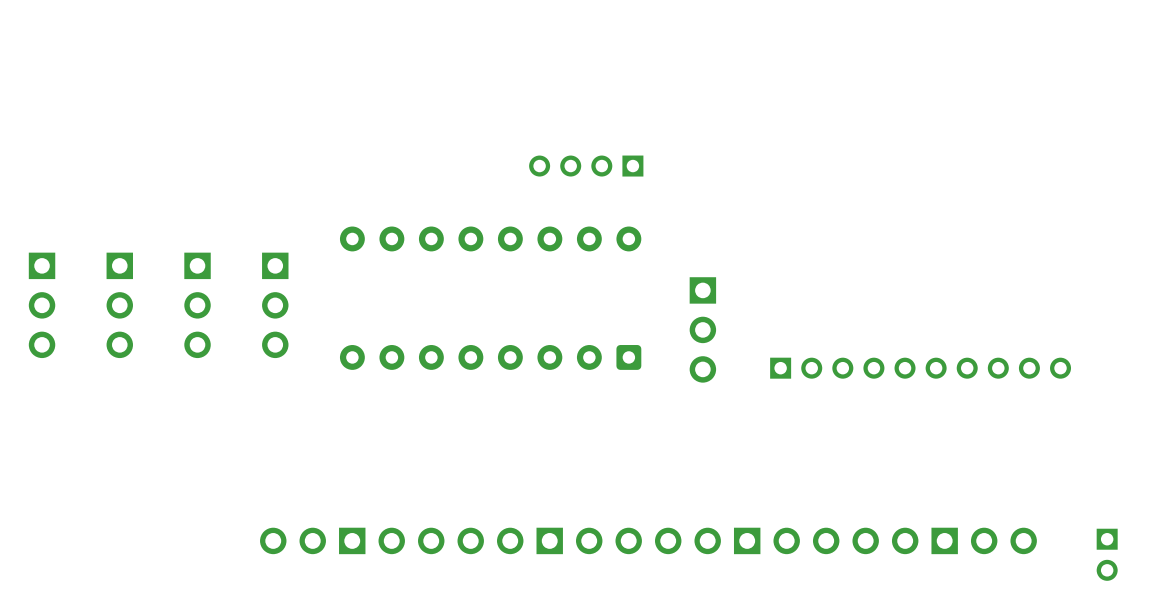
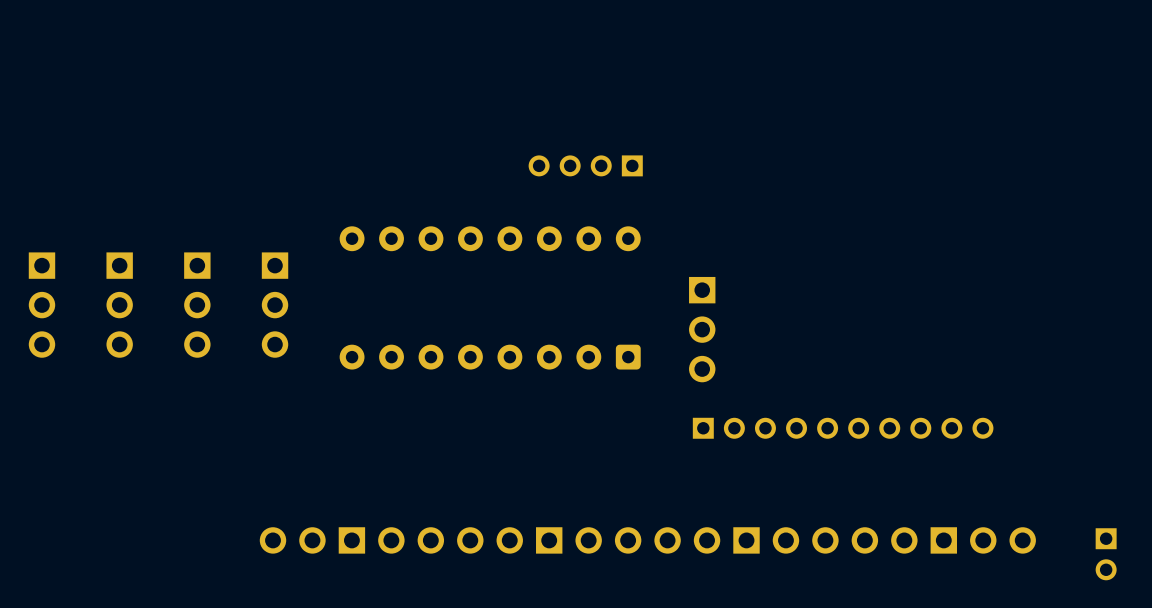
part position: (920, 368) -> (843, 428)

